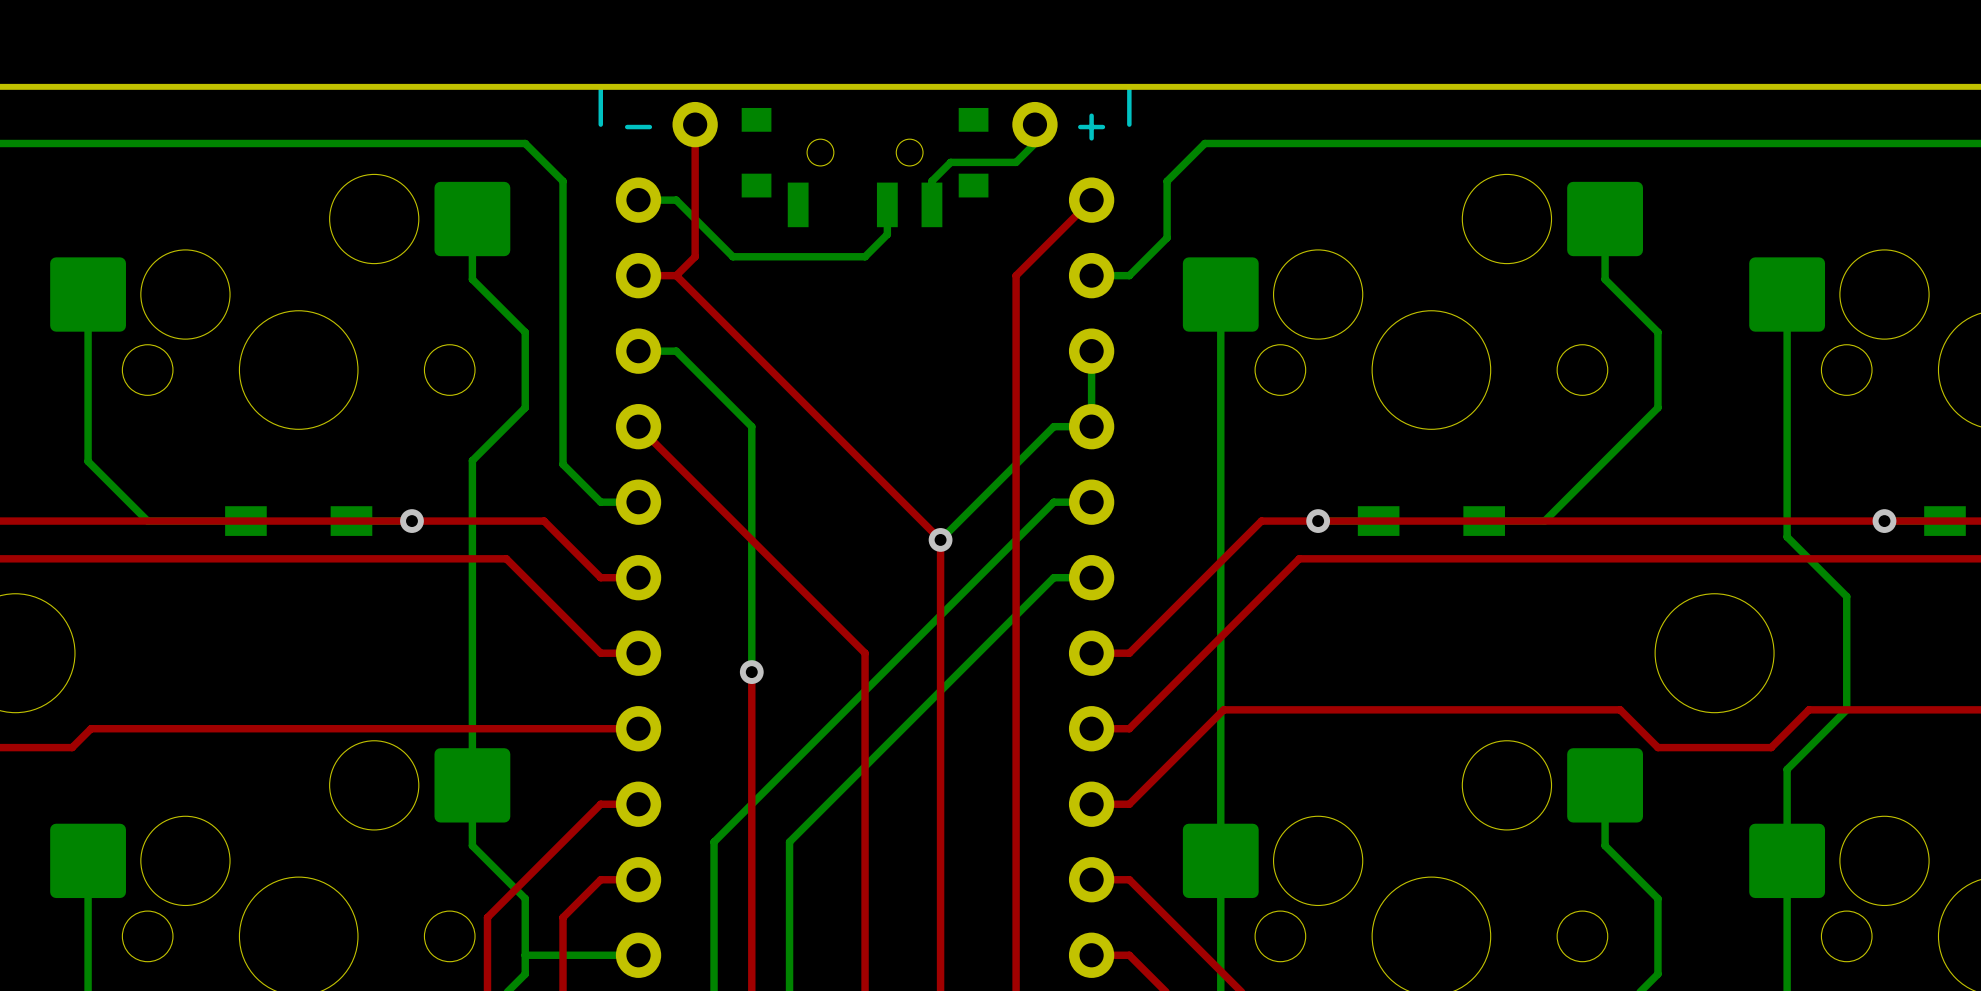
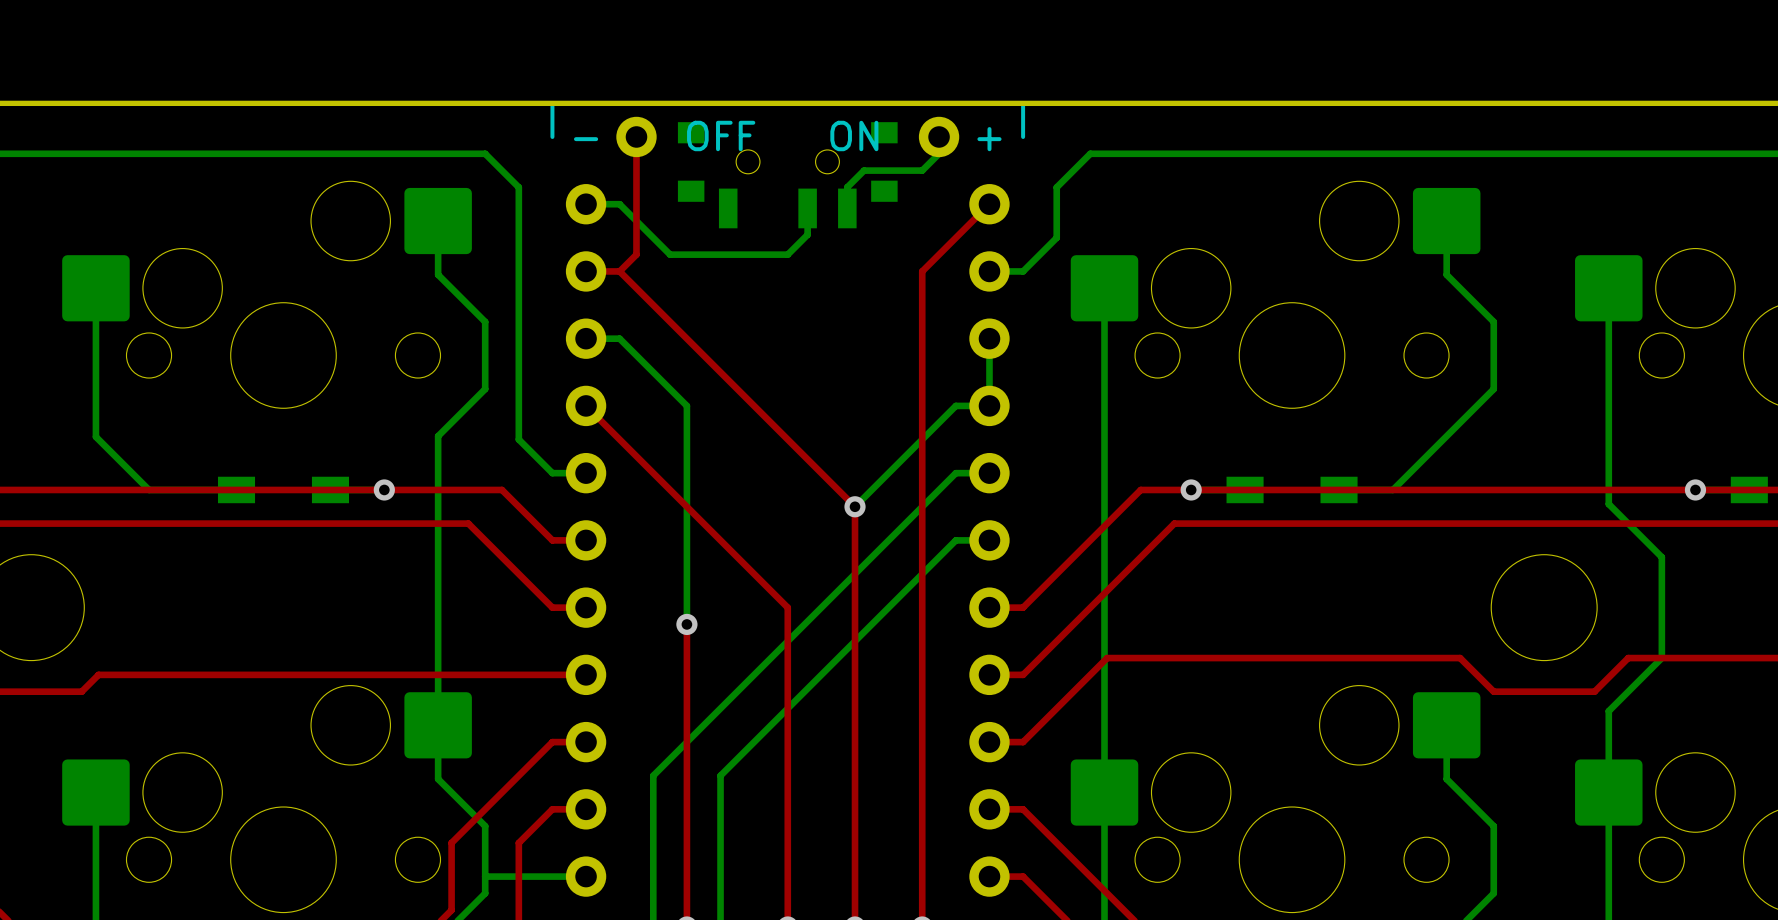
drawing: none -> [687, 120, 756, 152]
drawing: none -> [830, 120, 879, 152]

